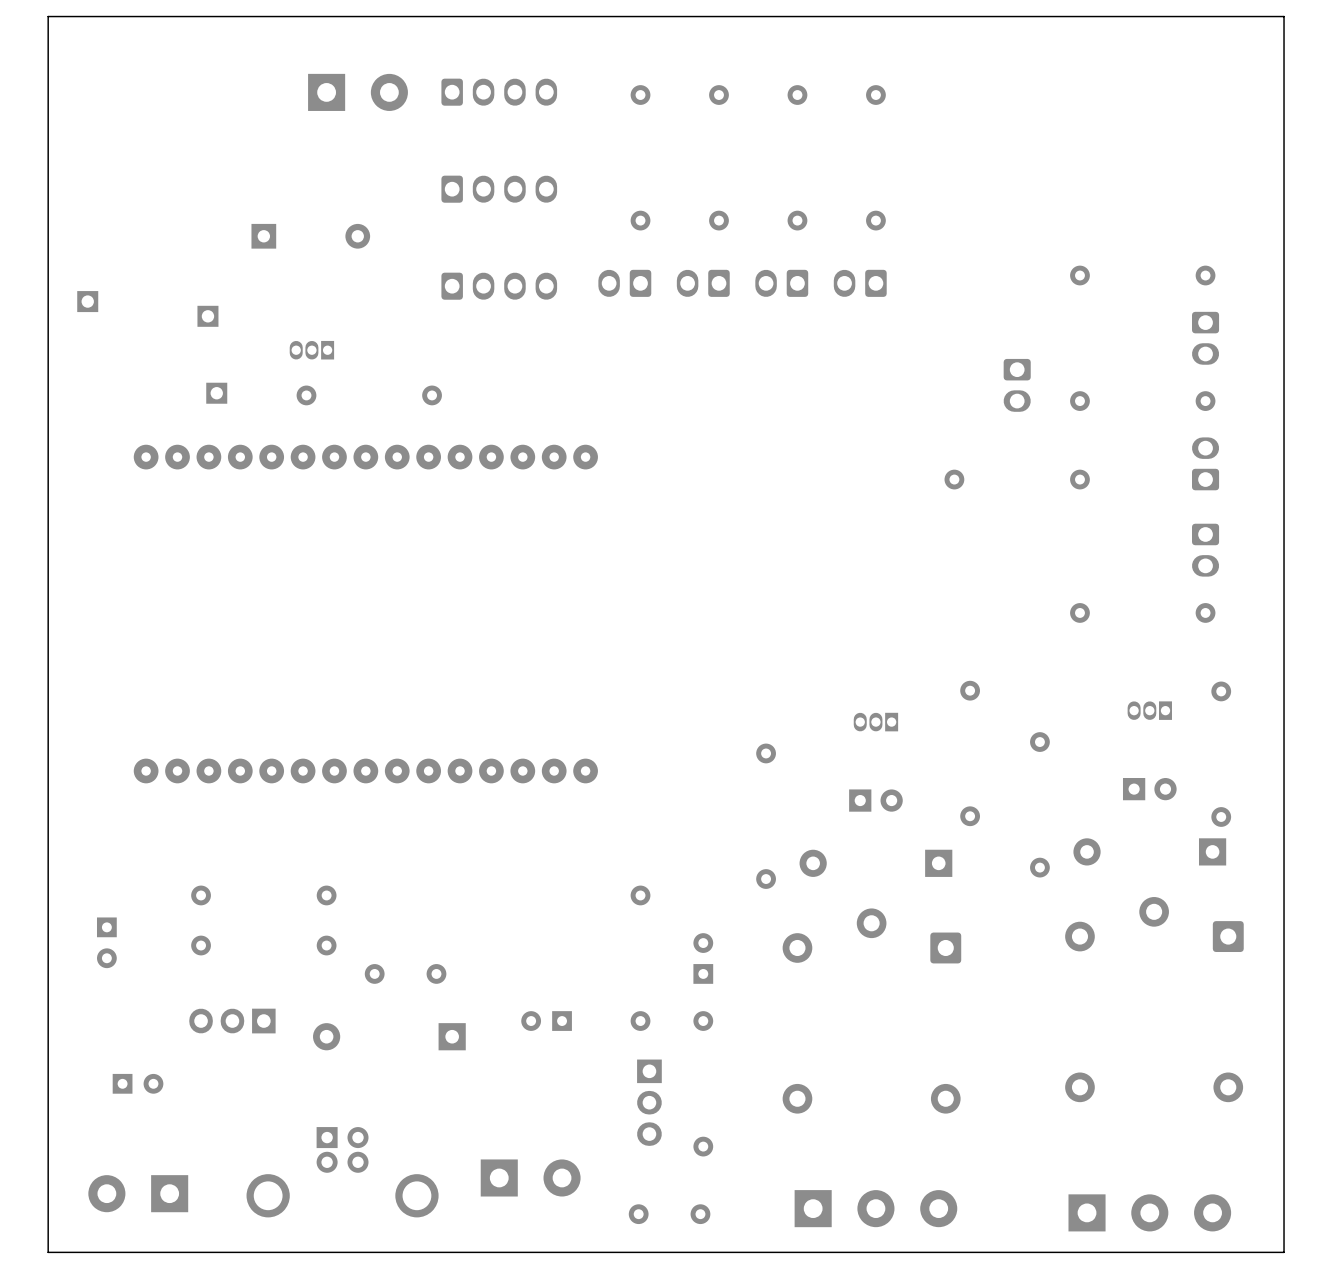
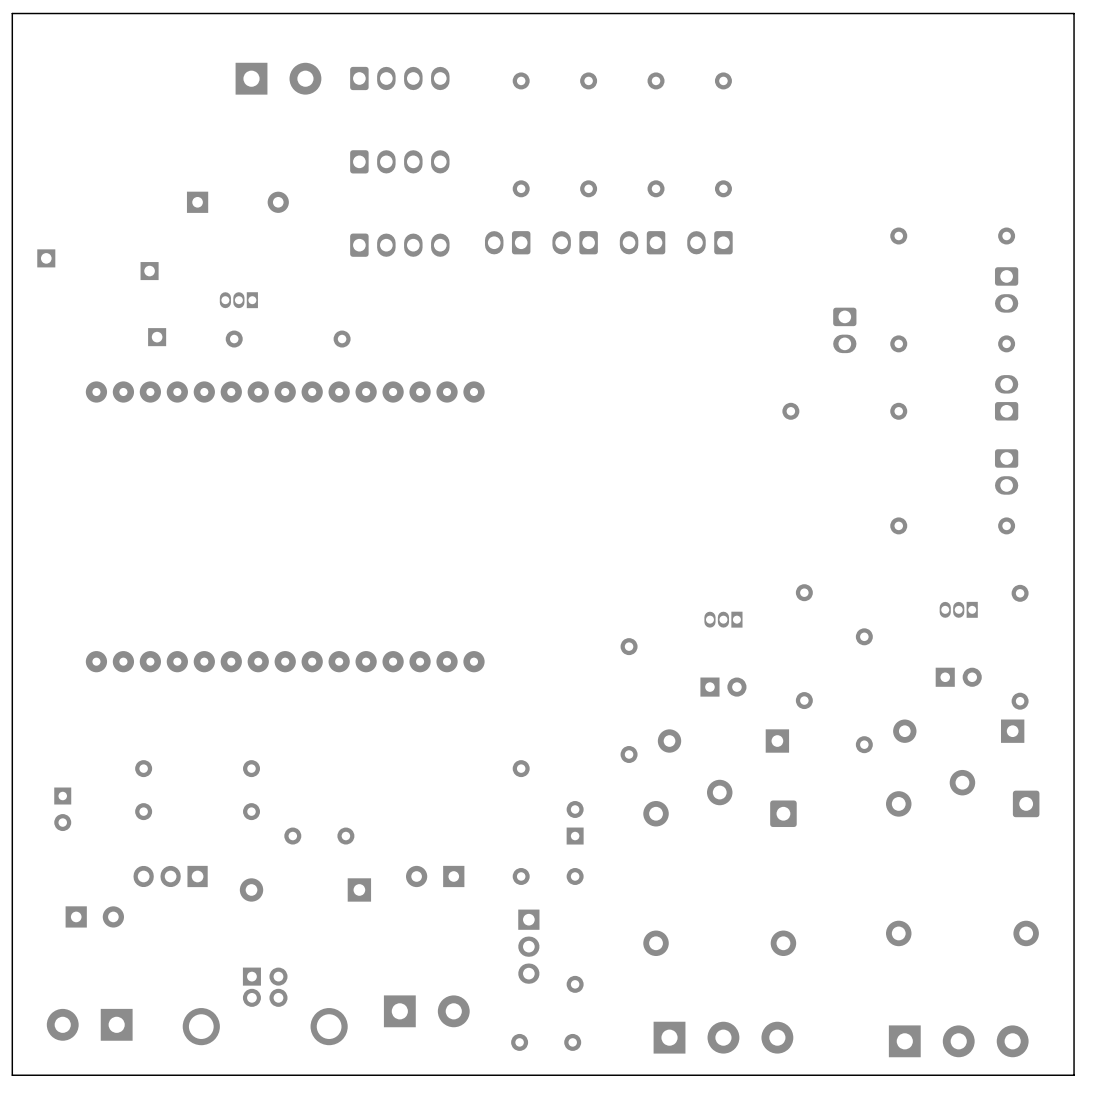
part footprint: [521, 1011, 572, 1031] -> [405, 865, 465, 888]
part: none -> (94, 916)
part: (138, 1083) -> none

